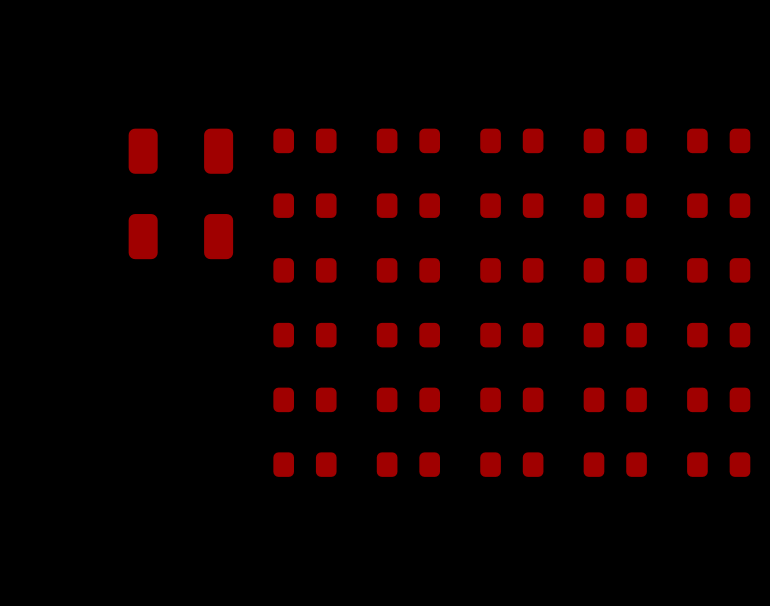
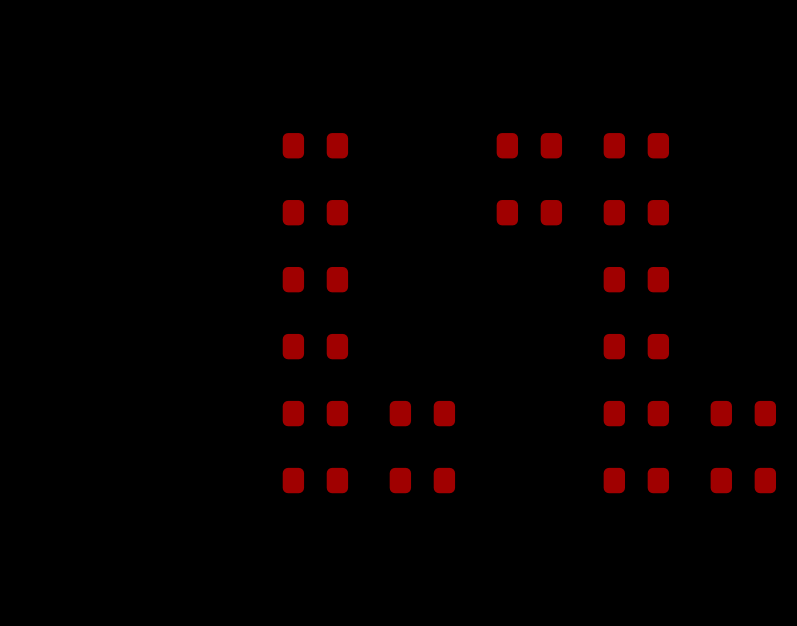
part: (408, 140) -> none
part: (718, 140) -> none
part: (180, 151) -> none
part: (408, 205) -> none
part: (718, 205) -> none
part: (180, 236) -> none
part: (408, 270) -> none
part: (511, 270) -> none
part: (718, 270) -> none
part: (408, 335) -> none
part: (511, 335) -> none
part: (718, 335) -> none
part: (511, 399) -> none
part: (511, 464) -> none

